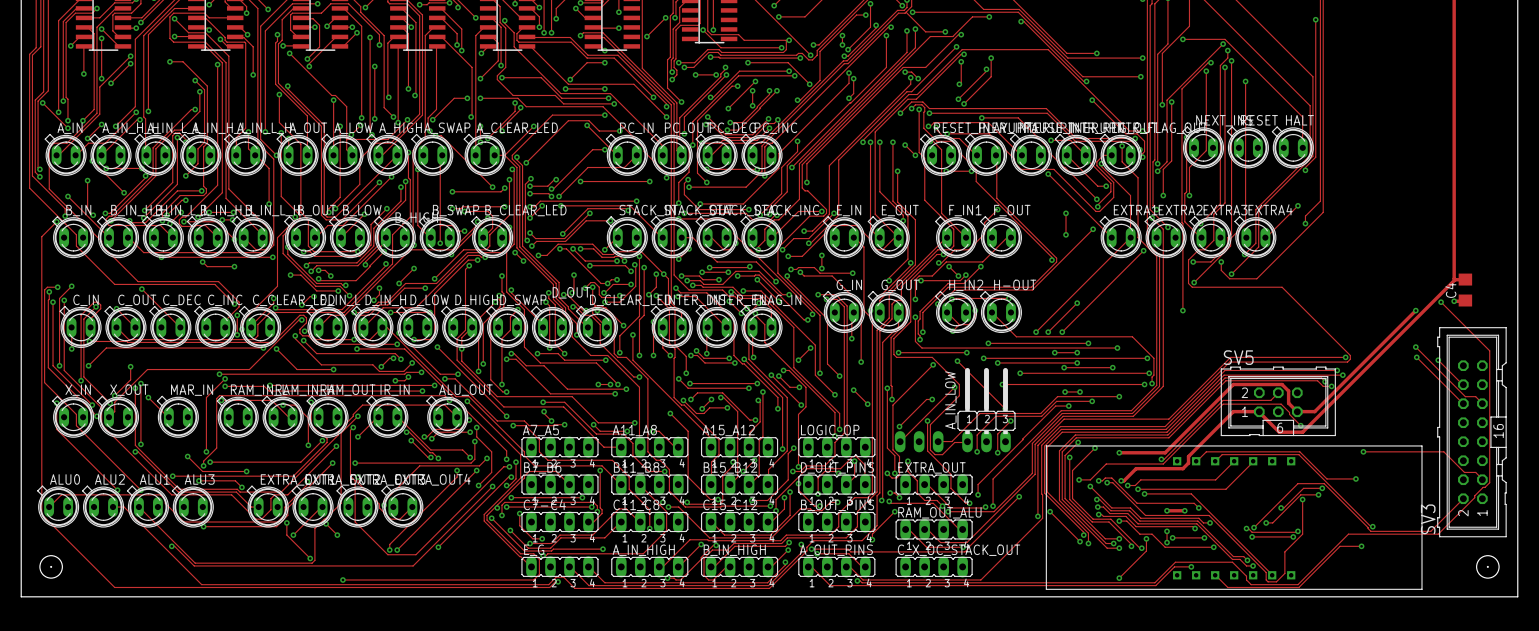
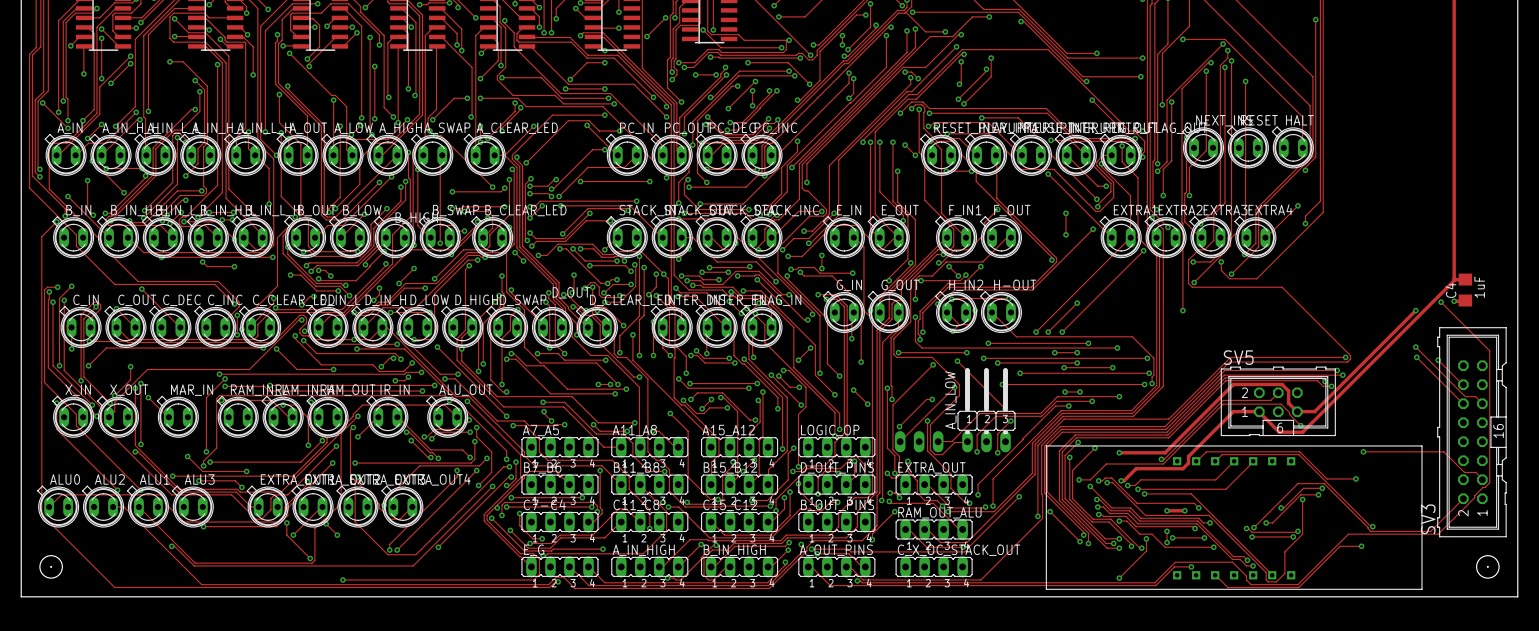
C4 value: none -> 1uF (1479, 287)

